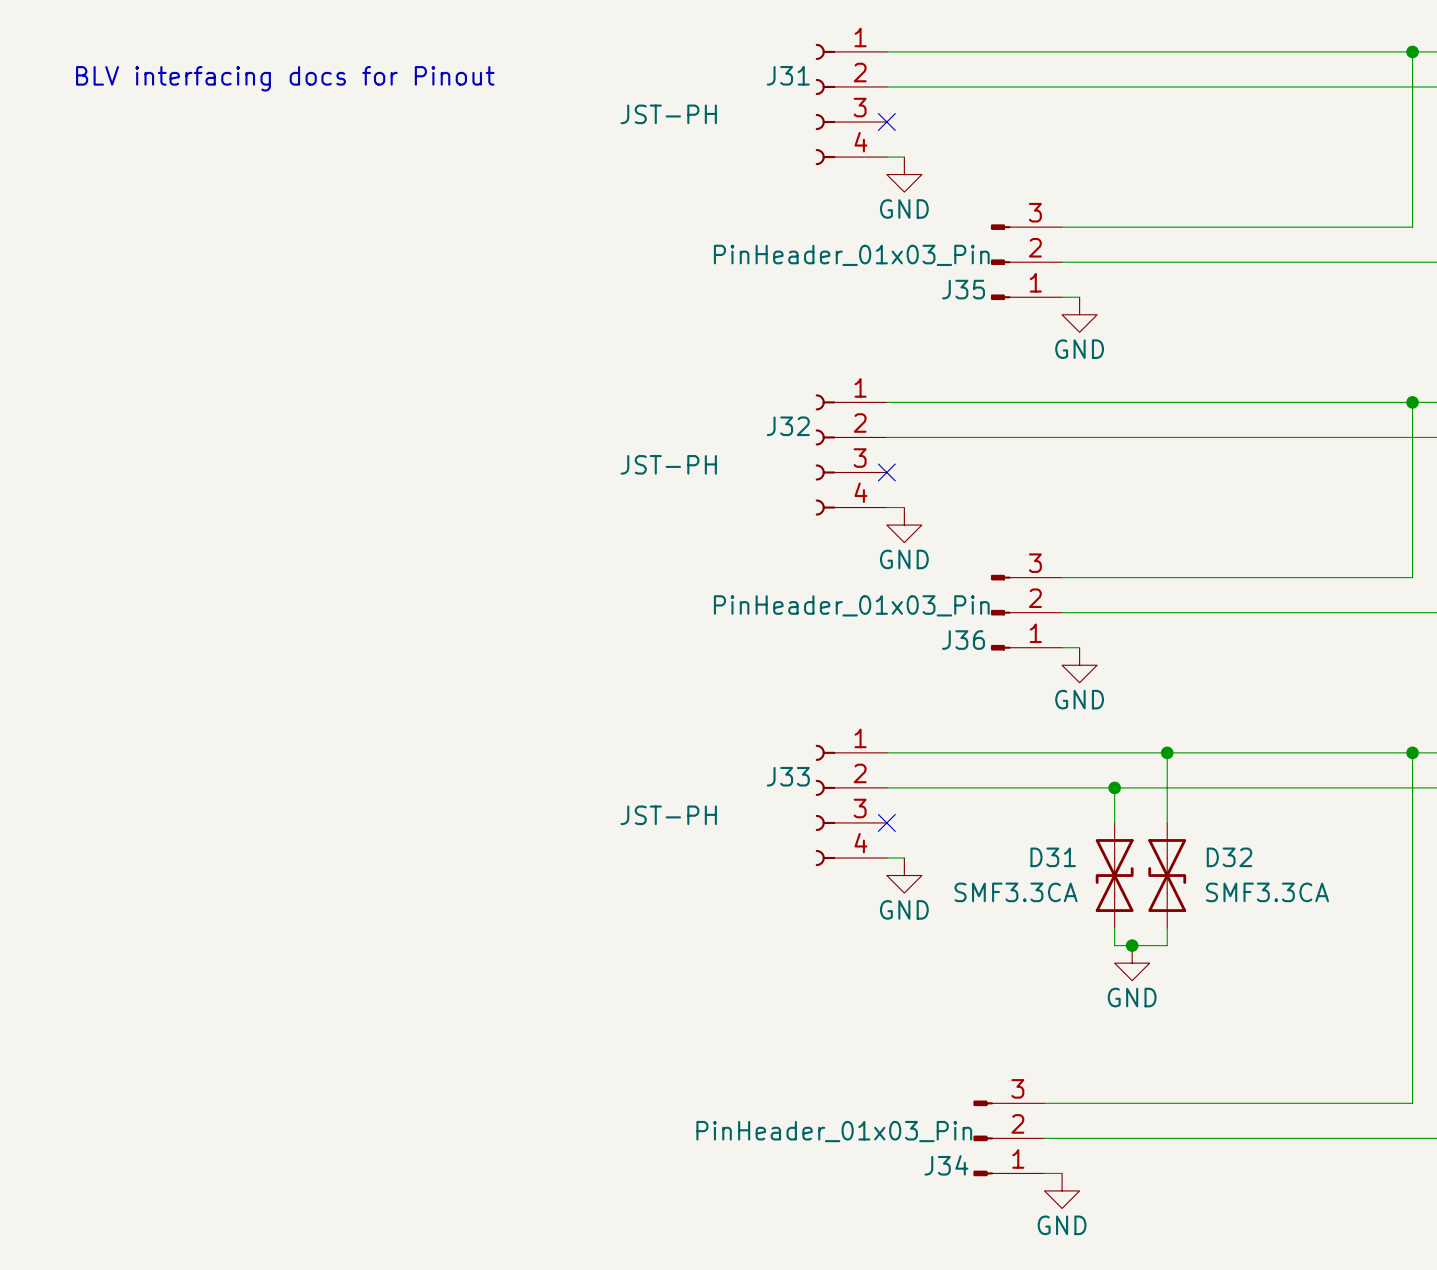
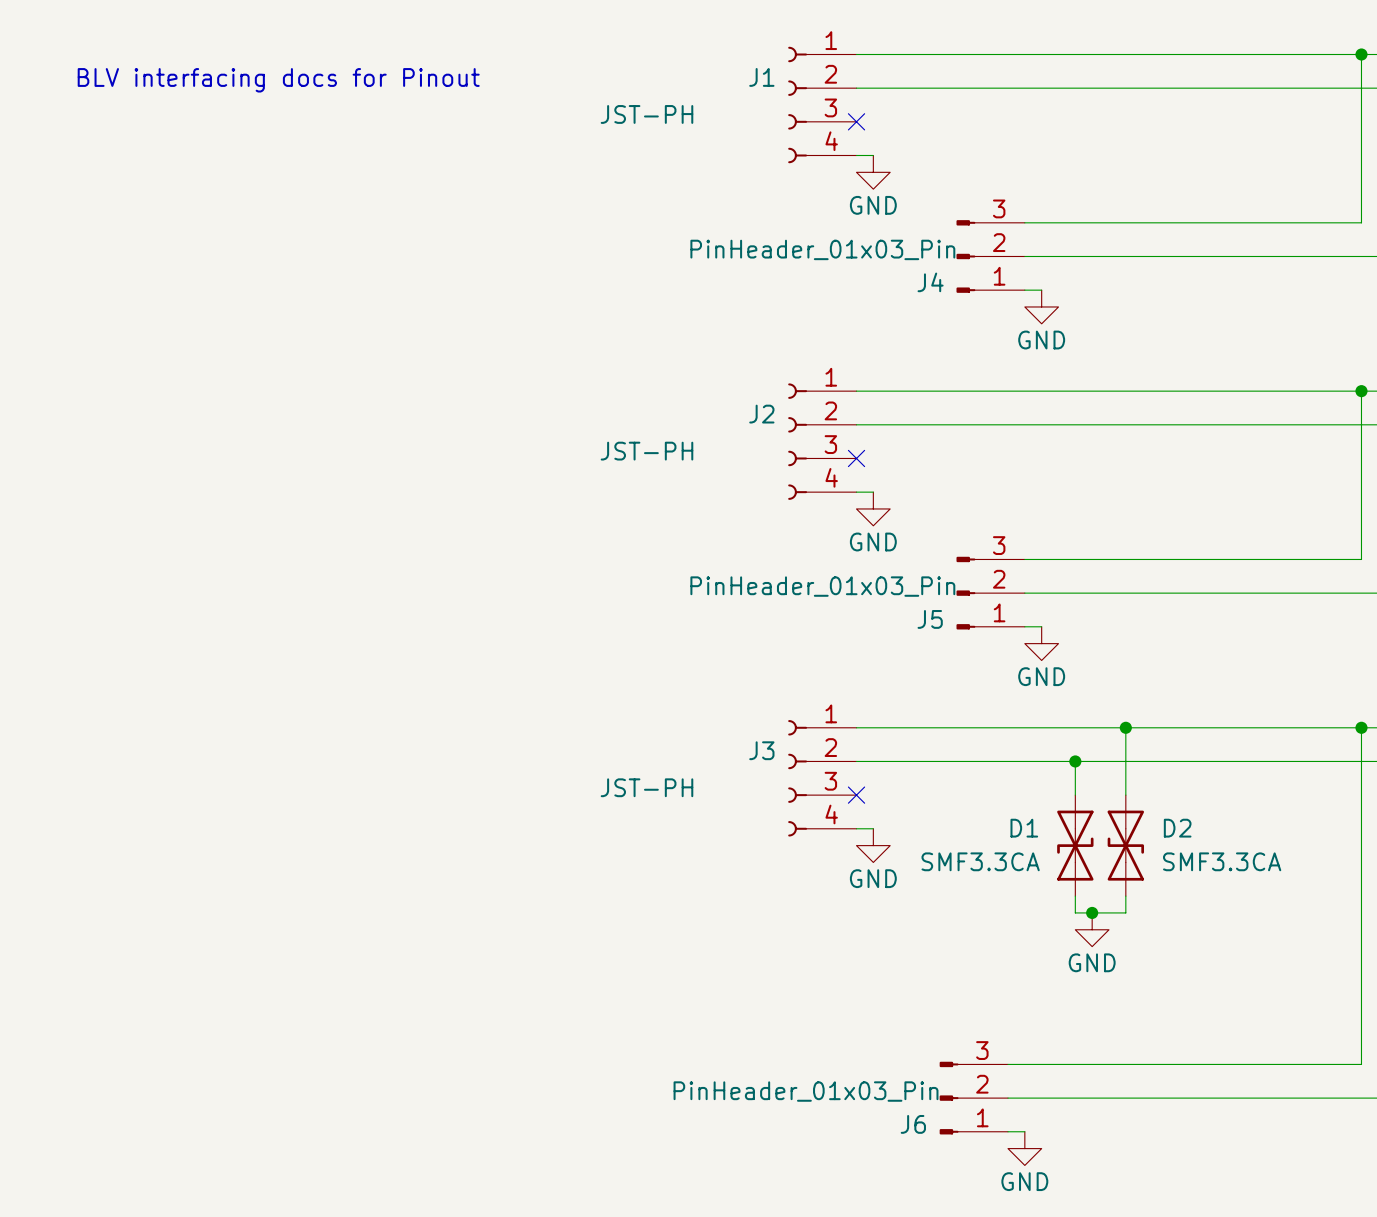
J31 name: J31 (788, 75) -> J1 (761, 77)
J35 name: J35 (963, 289) -> J4 (930, 282)
J32 name: J32 (788, 426) -> J2 (761, 414)
J36 name: J36 (963, 640) -> J5 (930, 619)
J33 name: J33 (788, 776) -> J3 (761, 750)
D31 name: D31 (1053, 857) -> D1 (1024, 828)
D32 name: D32 (1229, 857) -> D2 (1177, 828)
J34 name: J34 (946, 1165) -> J6 (913, 1124)

